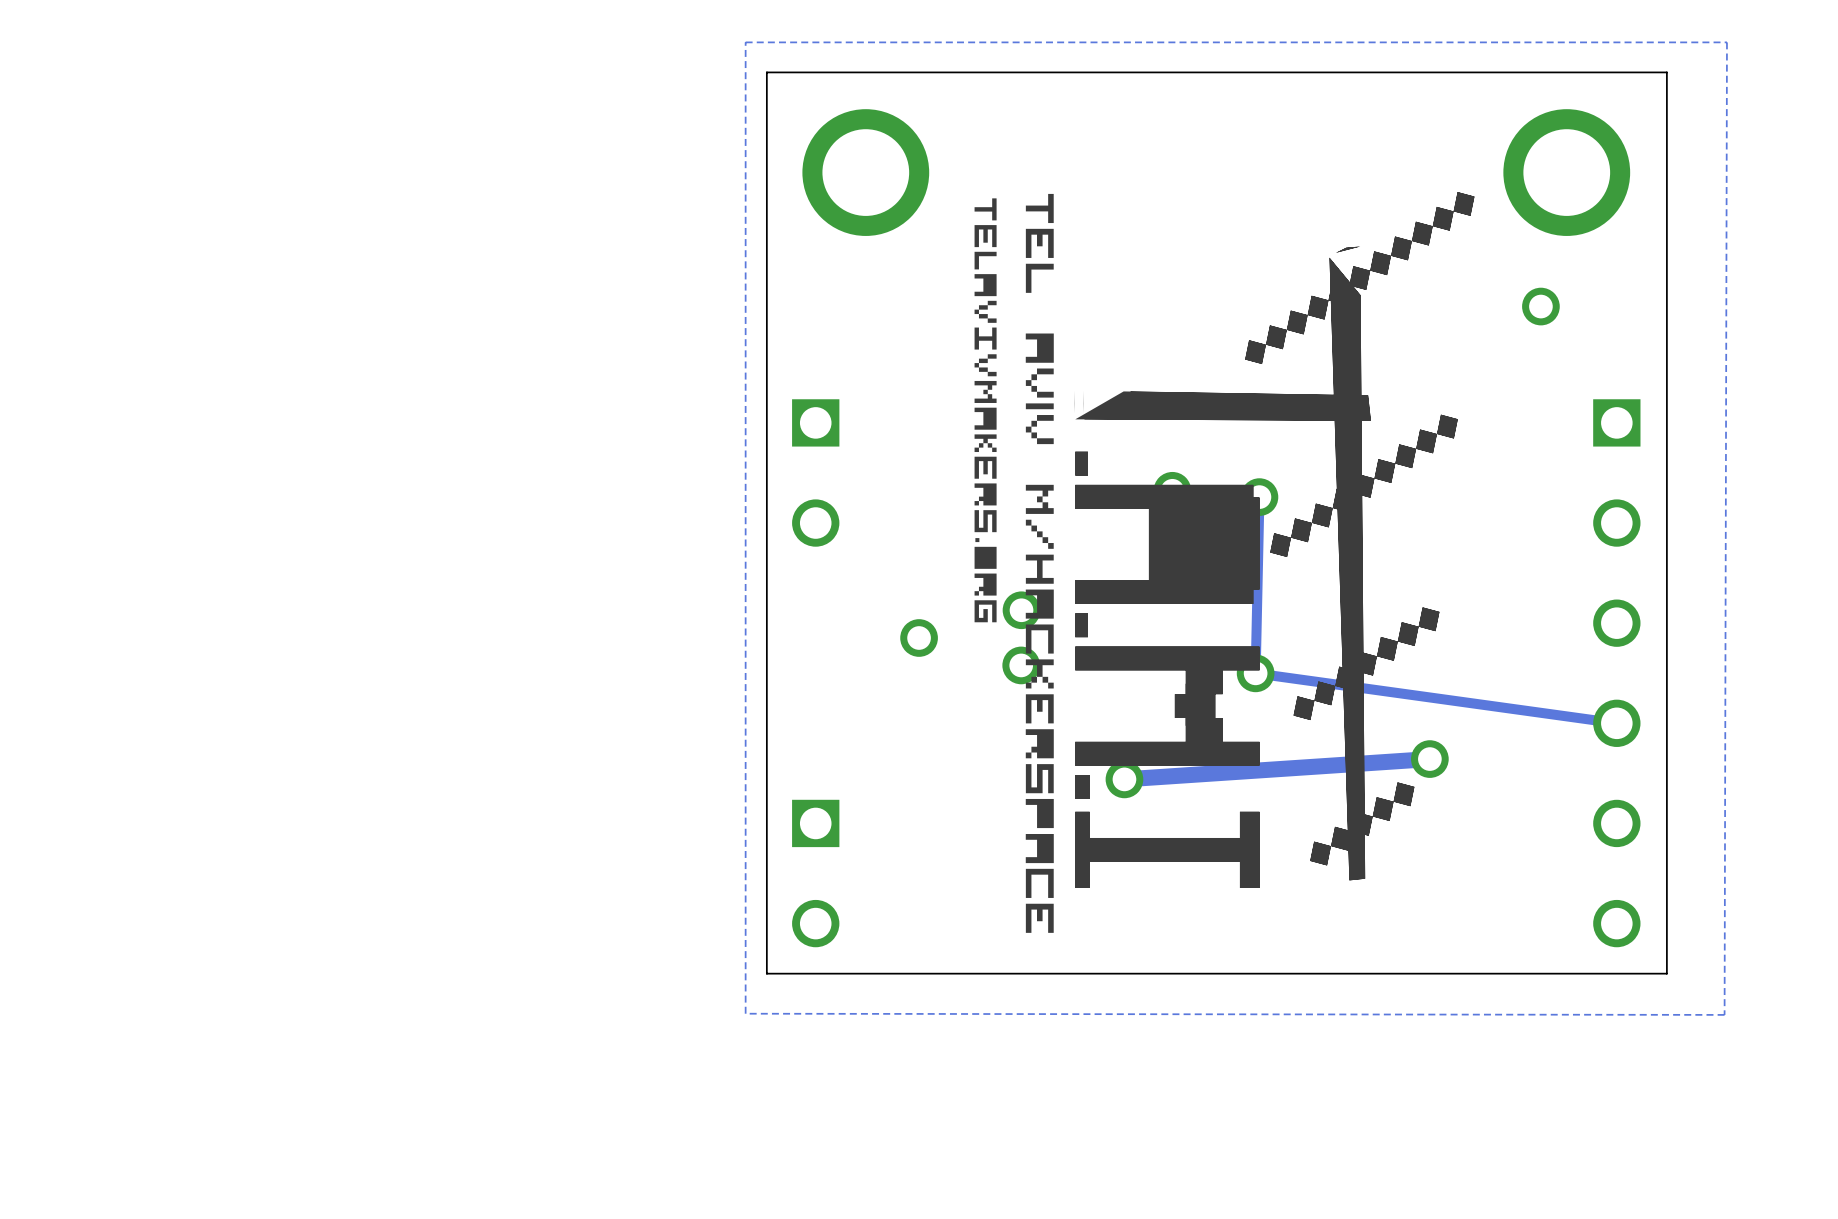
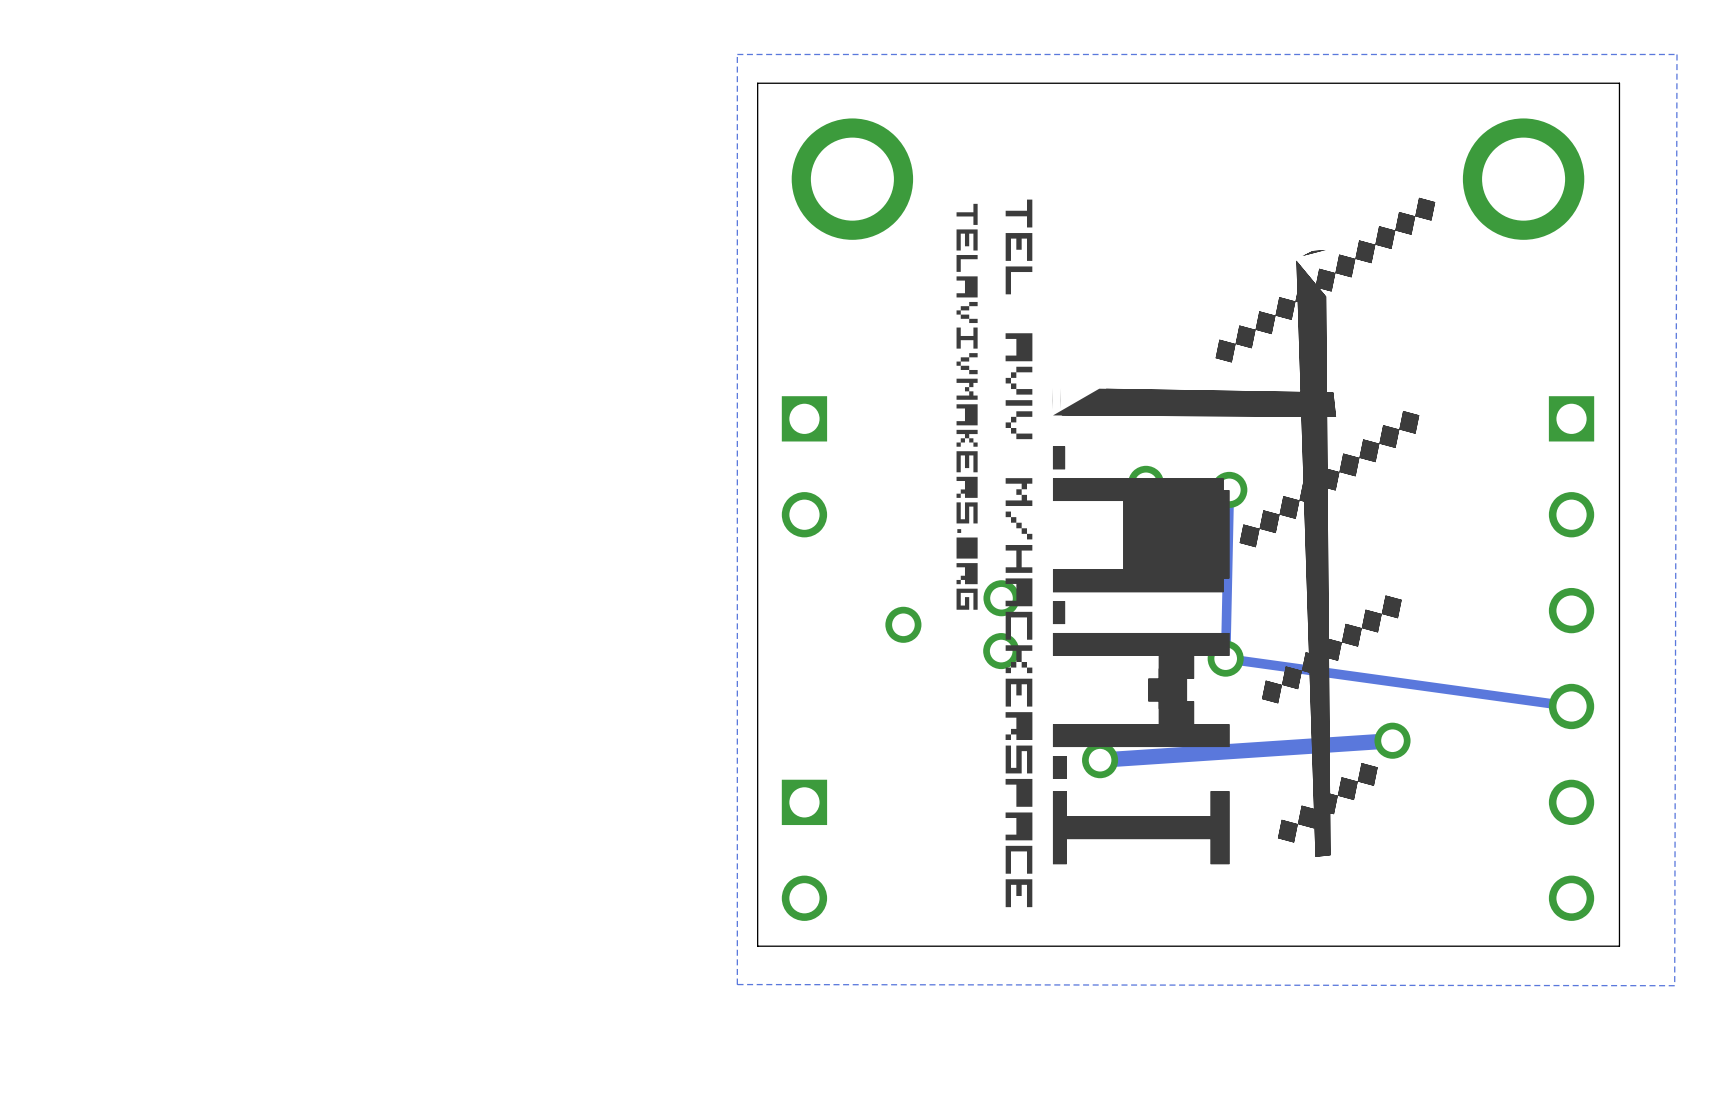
via: (1540, 306) -> none

